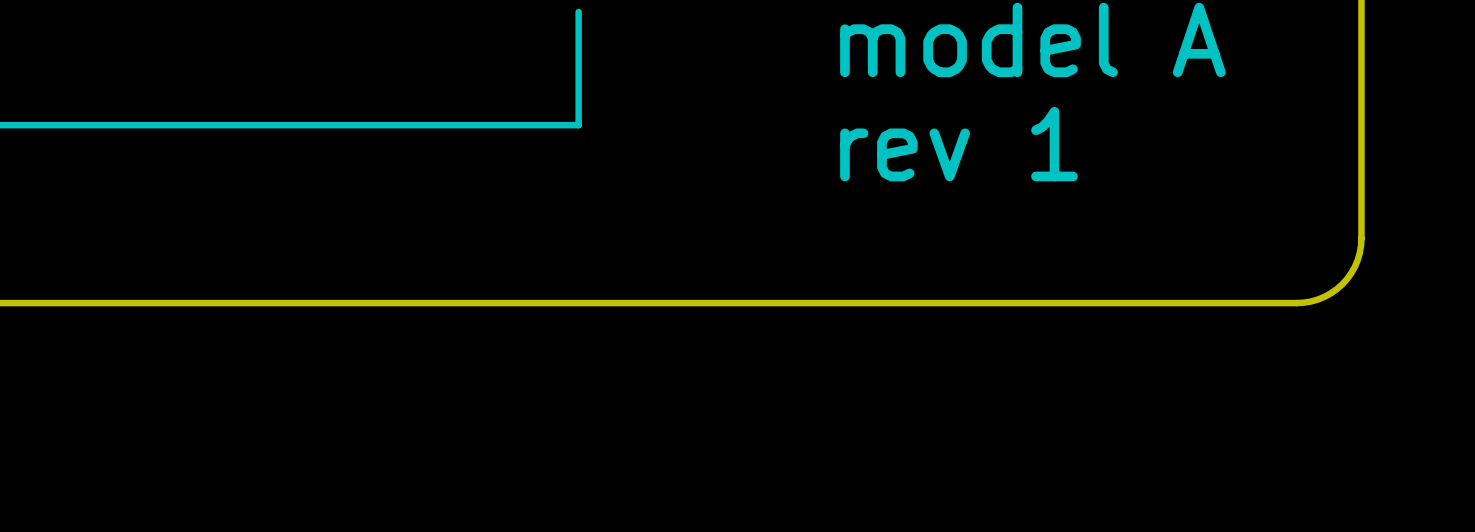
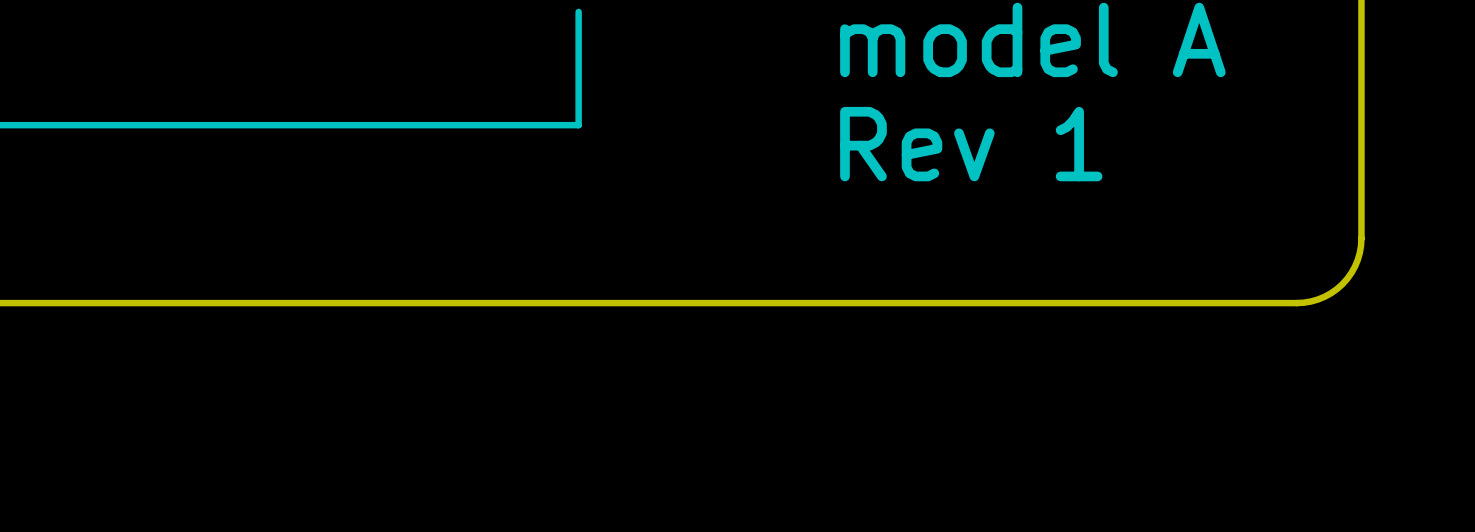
text: rev 1 (958, 144) -> Rev 1 (971, 144)

